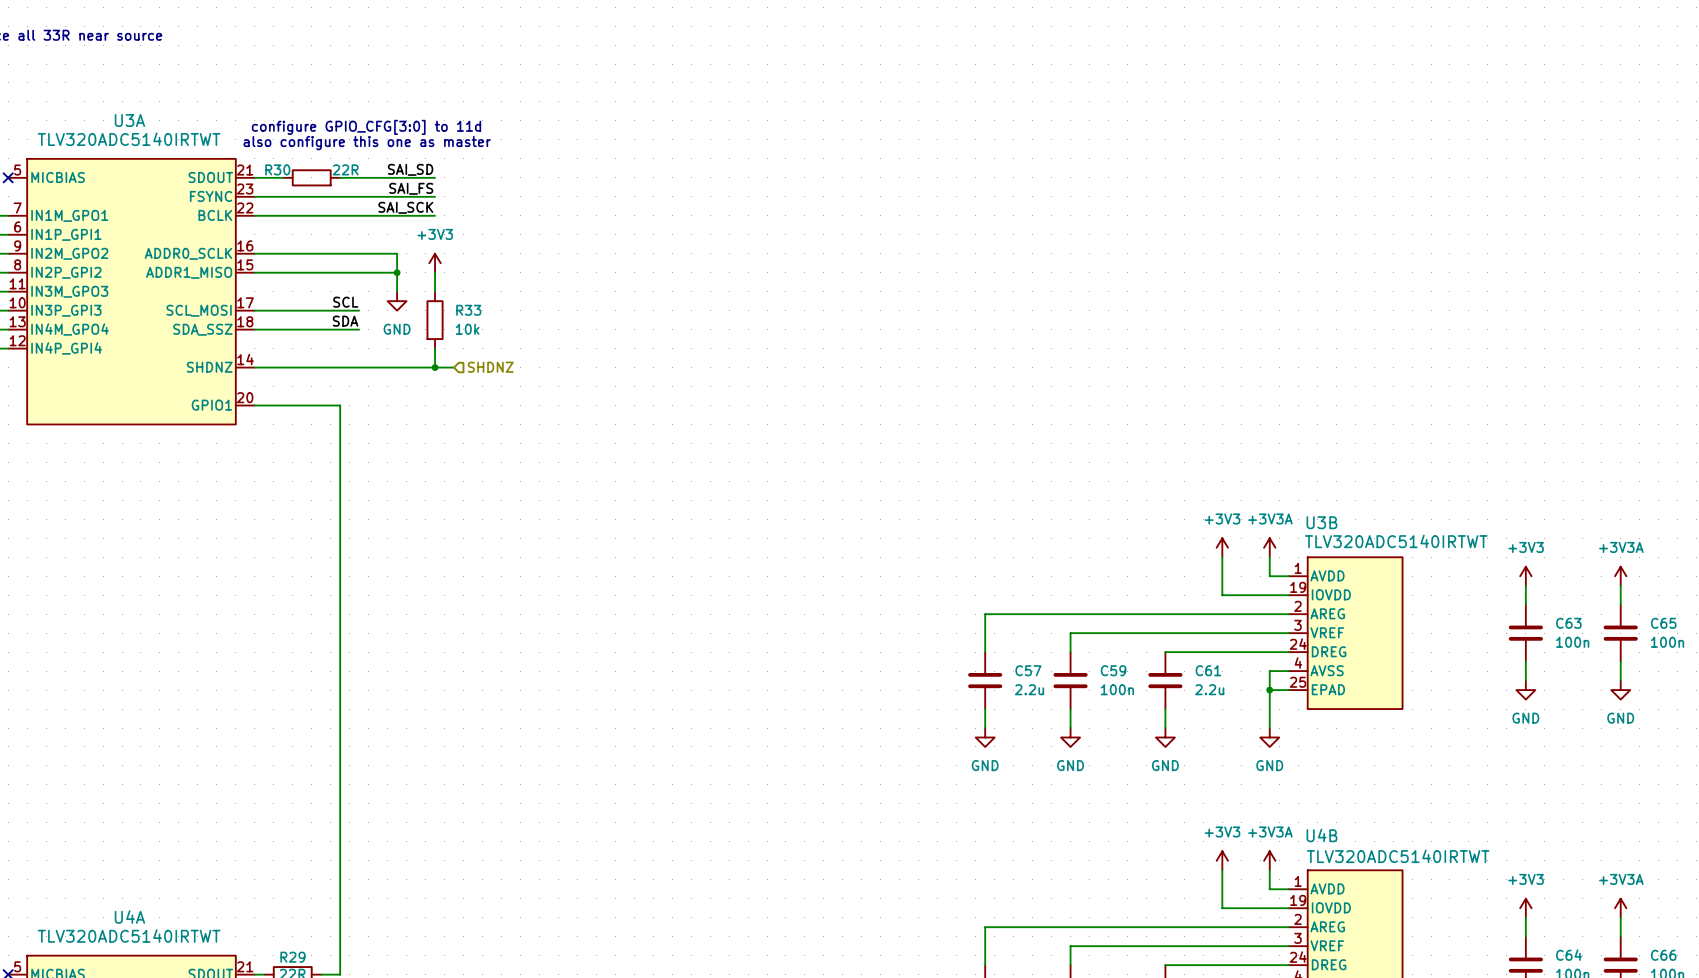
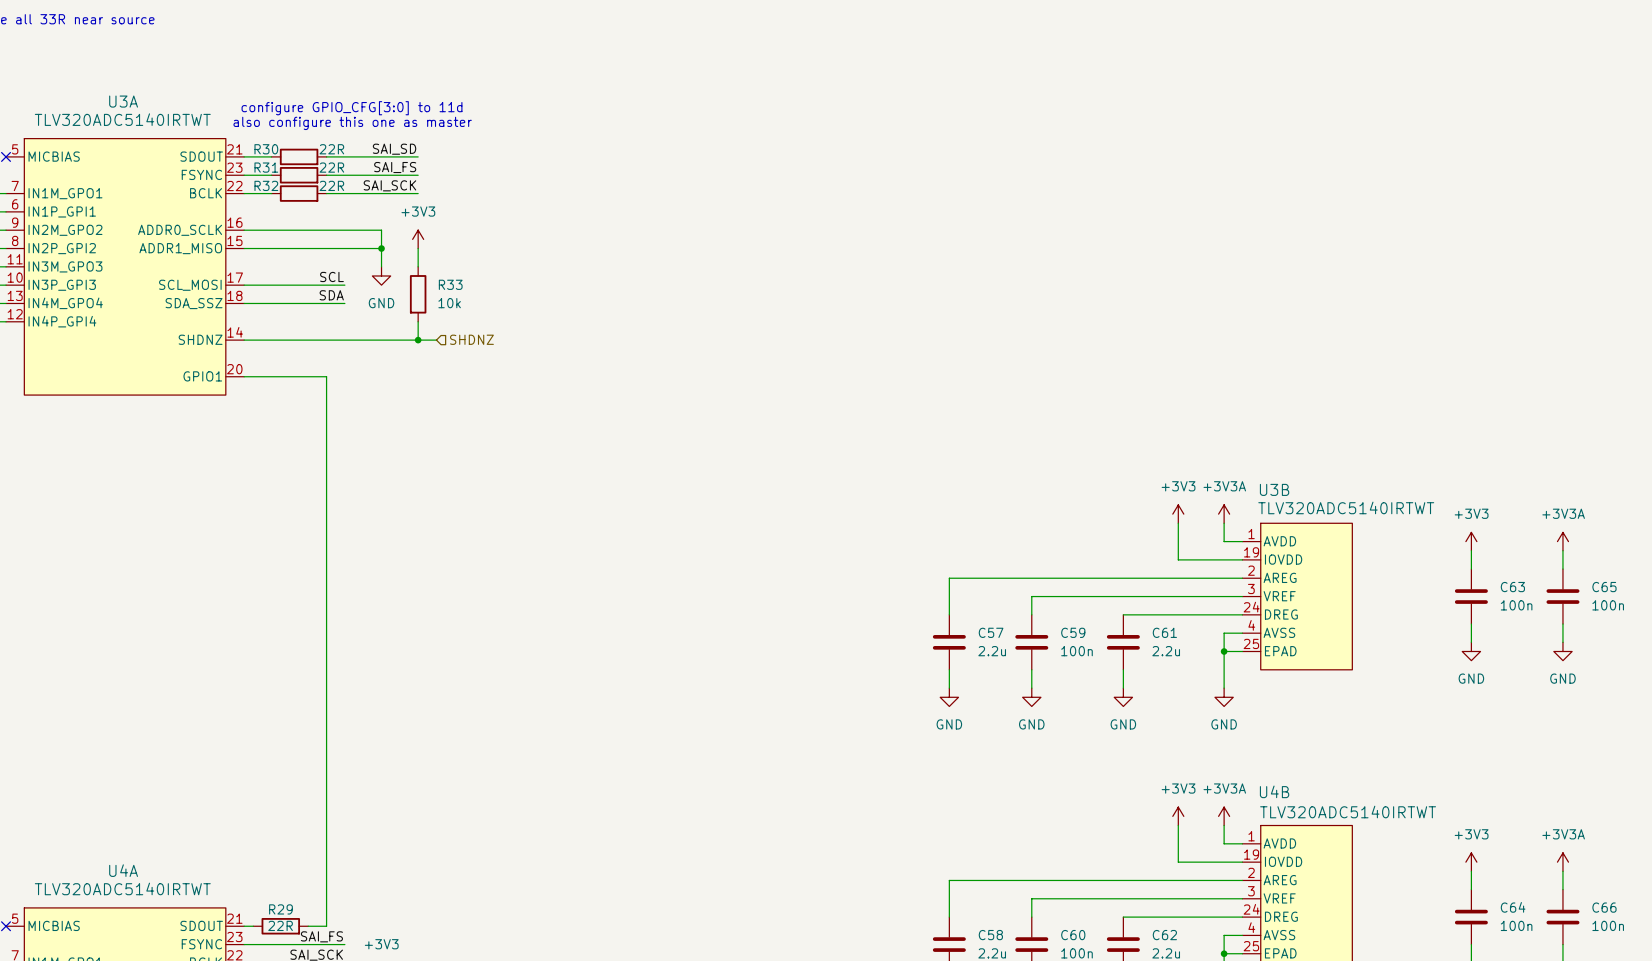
wire: (283, 196) (340, 196) -> none
R31: none -> 22R (299, 175)
wire: (283, 215) (340, 215) -> none
R32: none -> 22R (299, 193)

